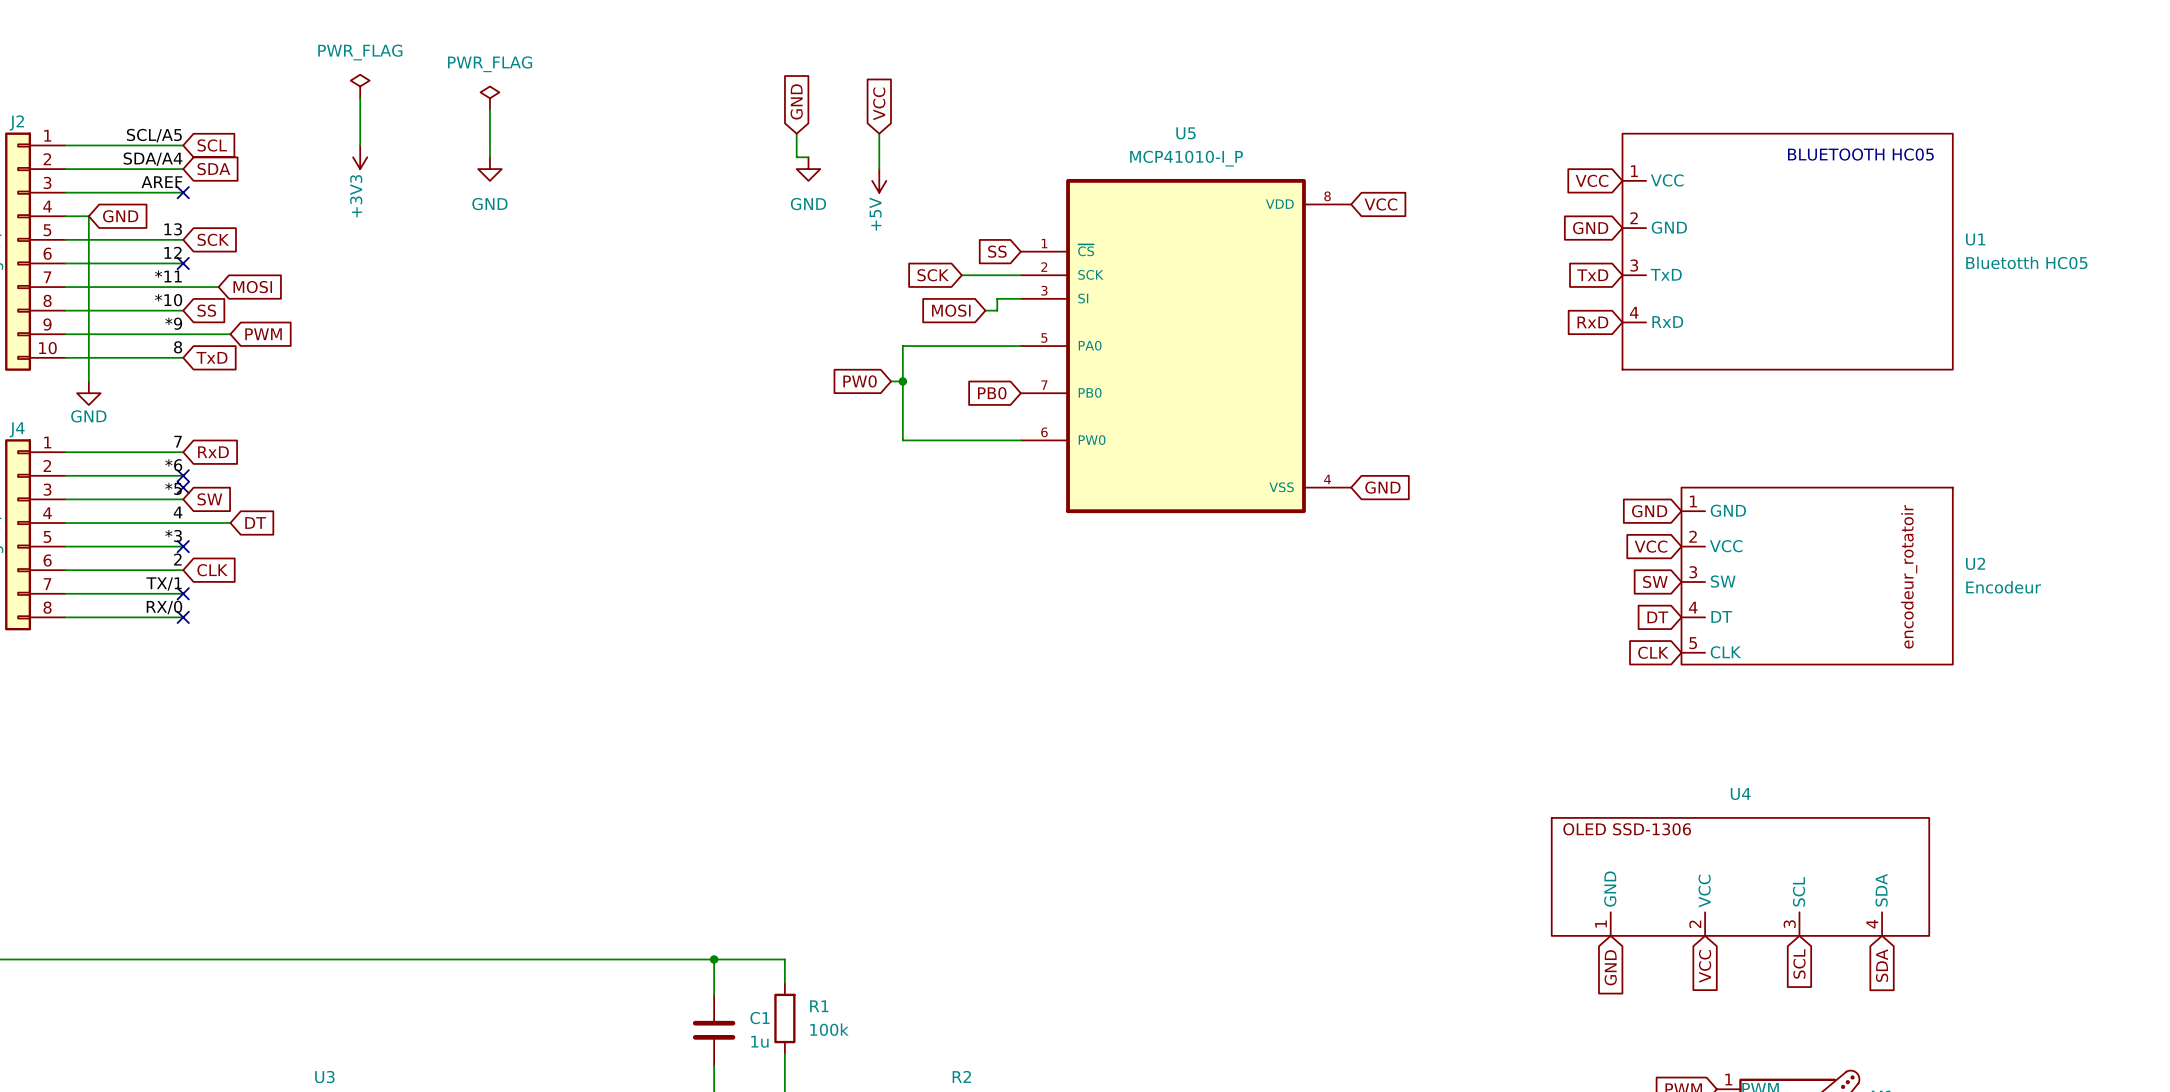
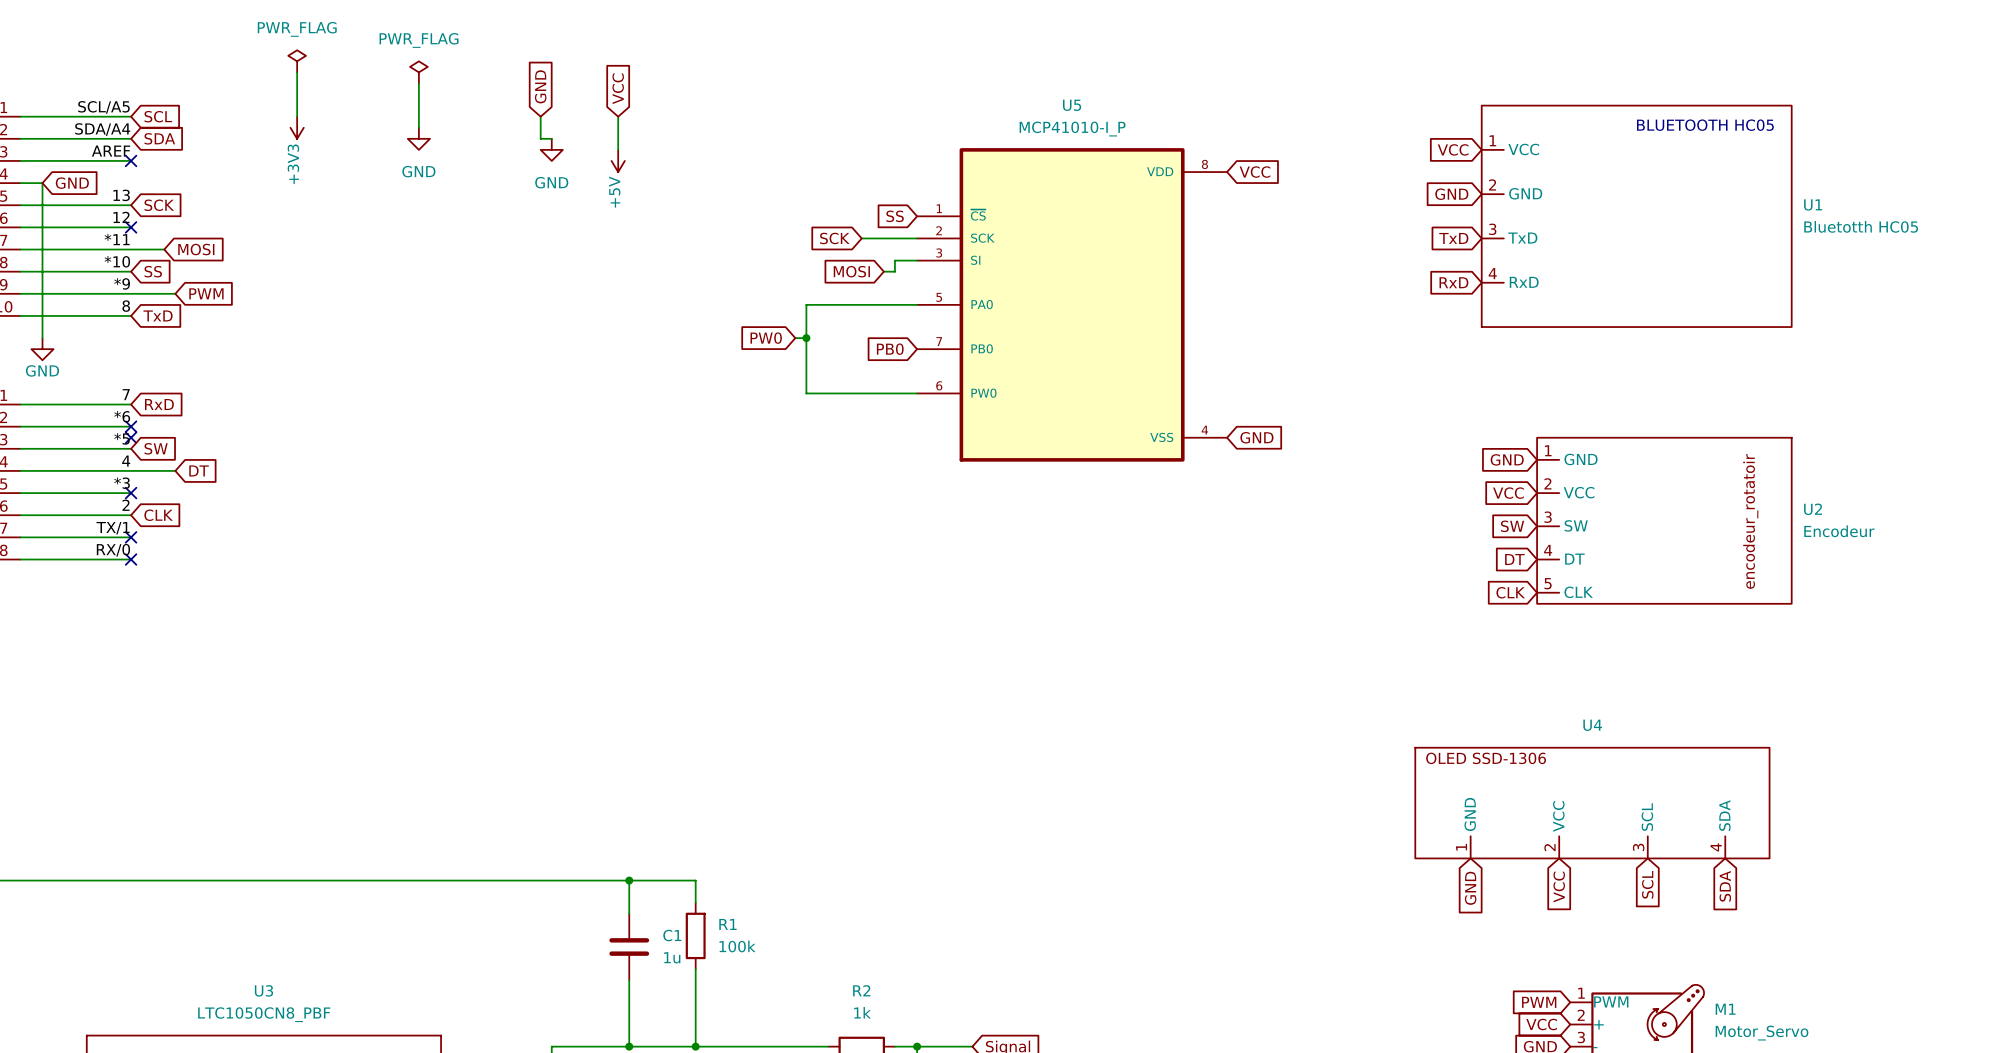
global label position: GND (796, 101) -> GND (540, 86)
global label position: VCC (879, 103) -> VCC (618, 88)
wire: (796, 133) (796, 157) (808, 157) -> (540, 116) (540, 138) (551, 138)
wire: (879, 133) (879, 169) -> (618, 116) (618, 149)
power symbol position: GND (808, 169) -> GND (551, 149)
power symbol position: +5V (879, 180) -> +5V (618, 160)

